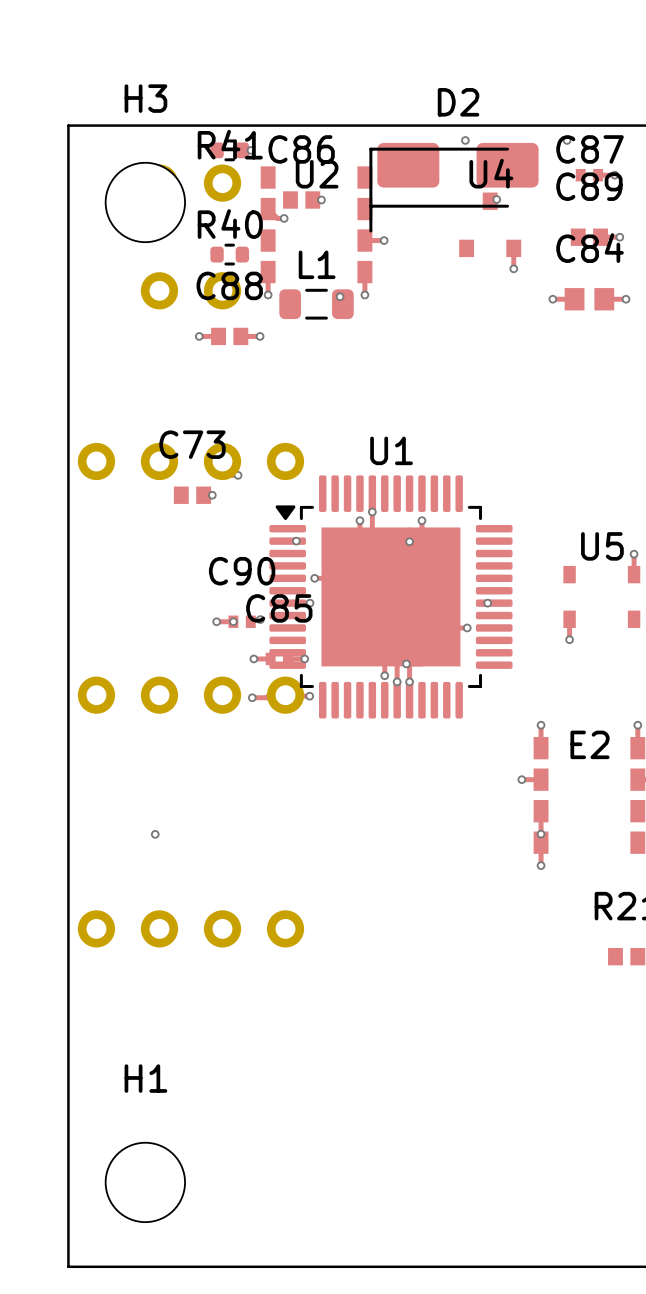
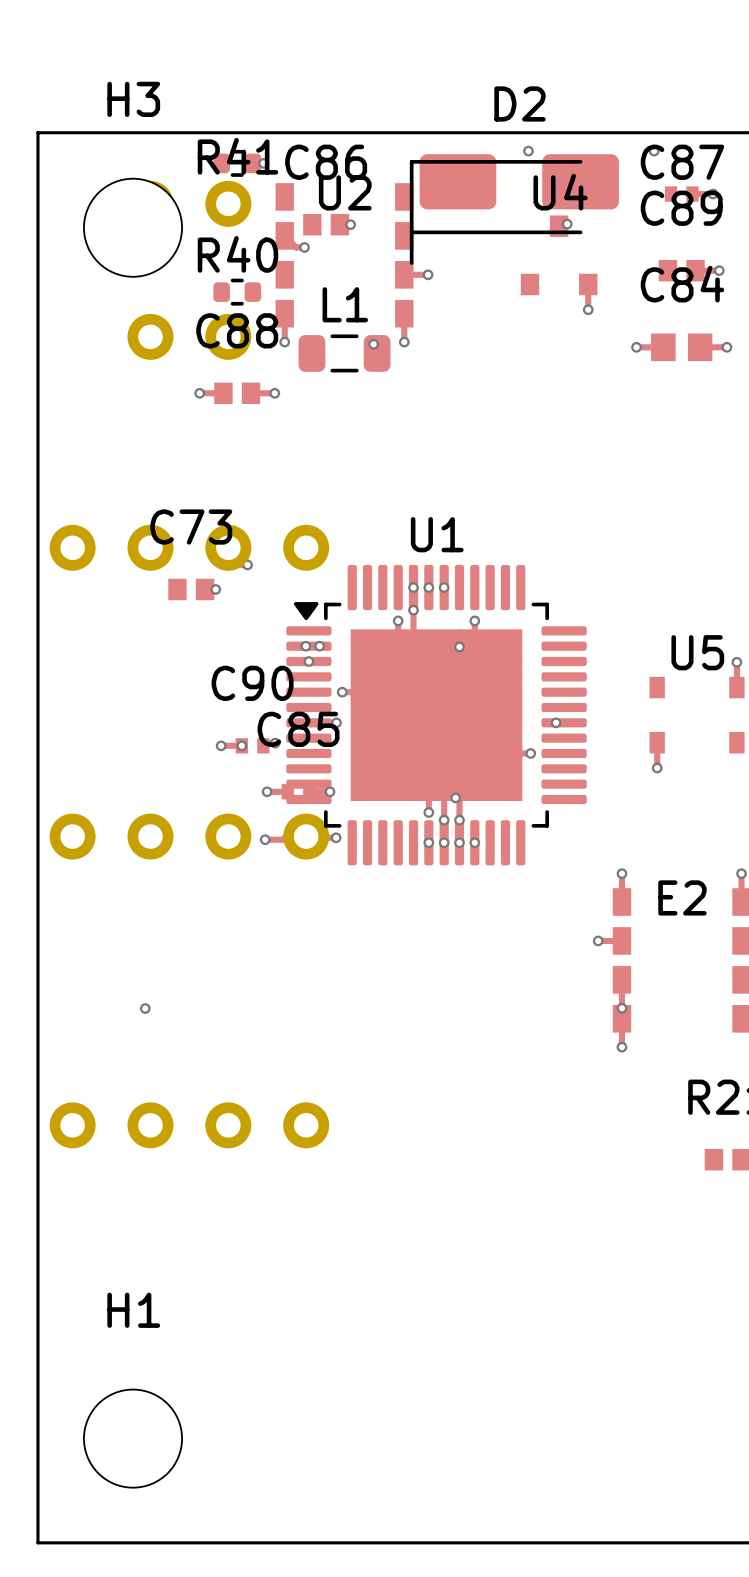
via: none -> (413, 587)
via: none -> (428, 587)
via: none -> (444, 587)
via: none -> (305, 646)
via: none -> (308, 661)
via: none -> (428, 842)
via: none -> (444, 842)
via: none -> (459, 842)
via: none -> (474, 842)

